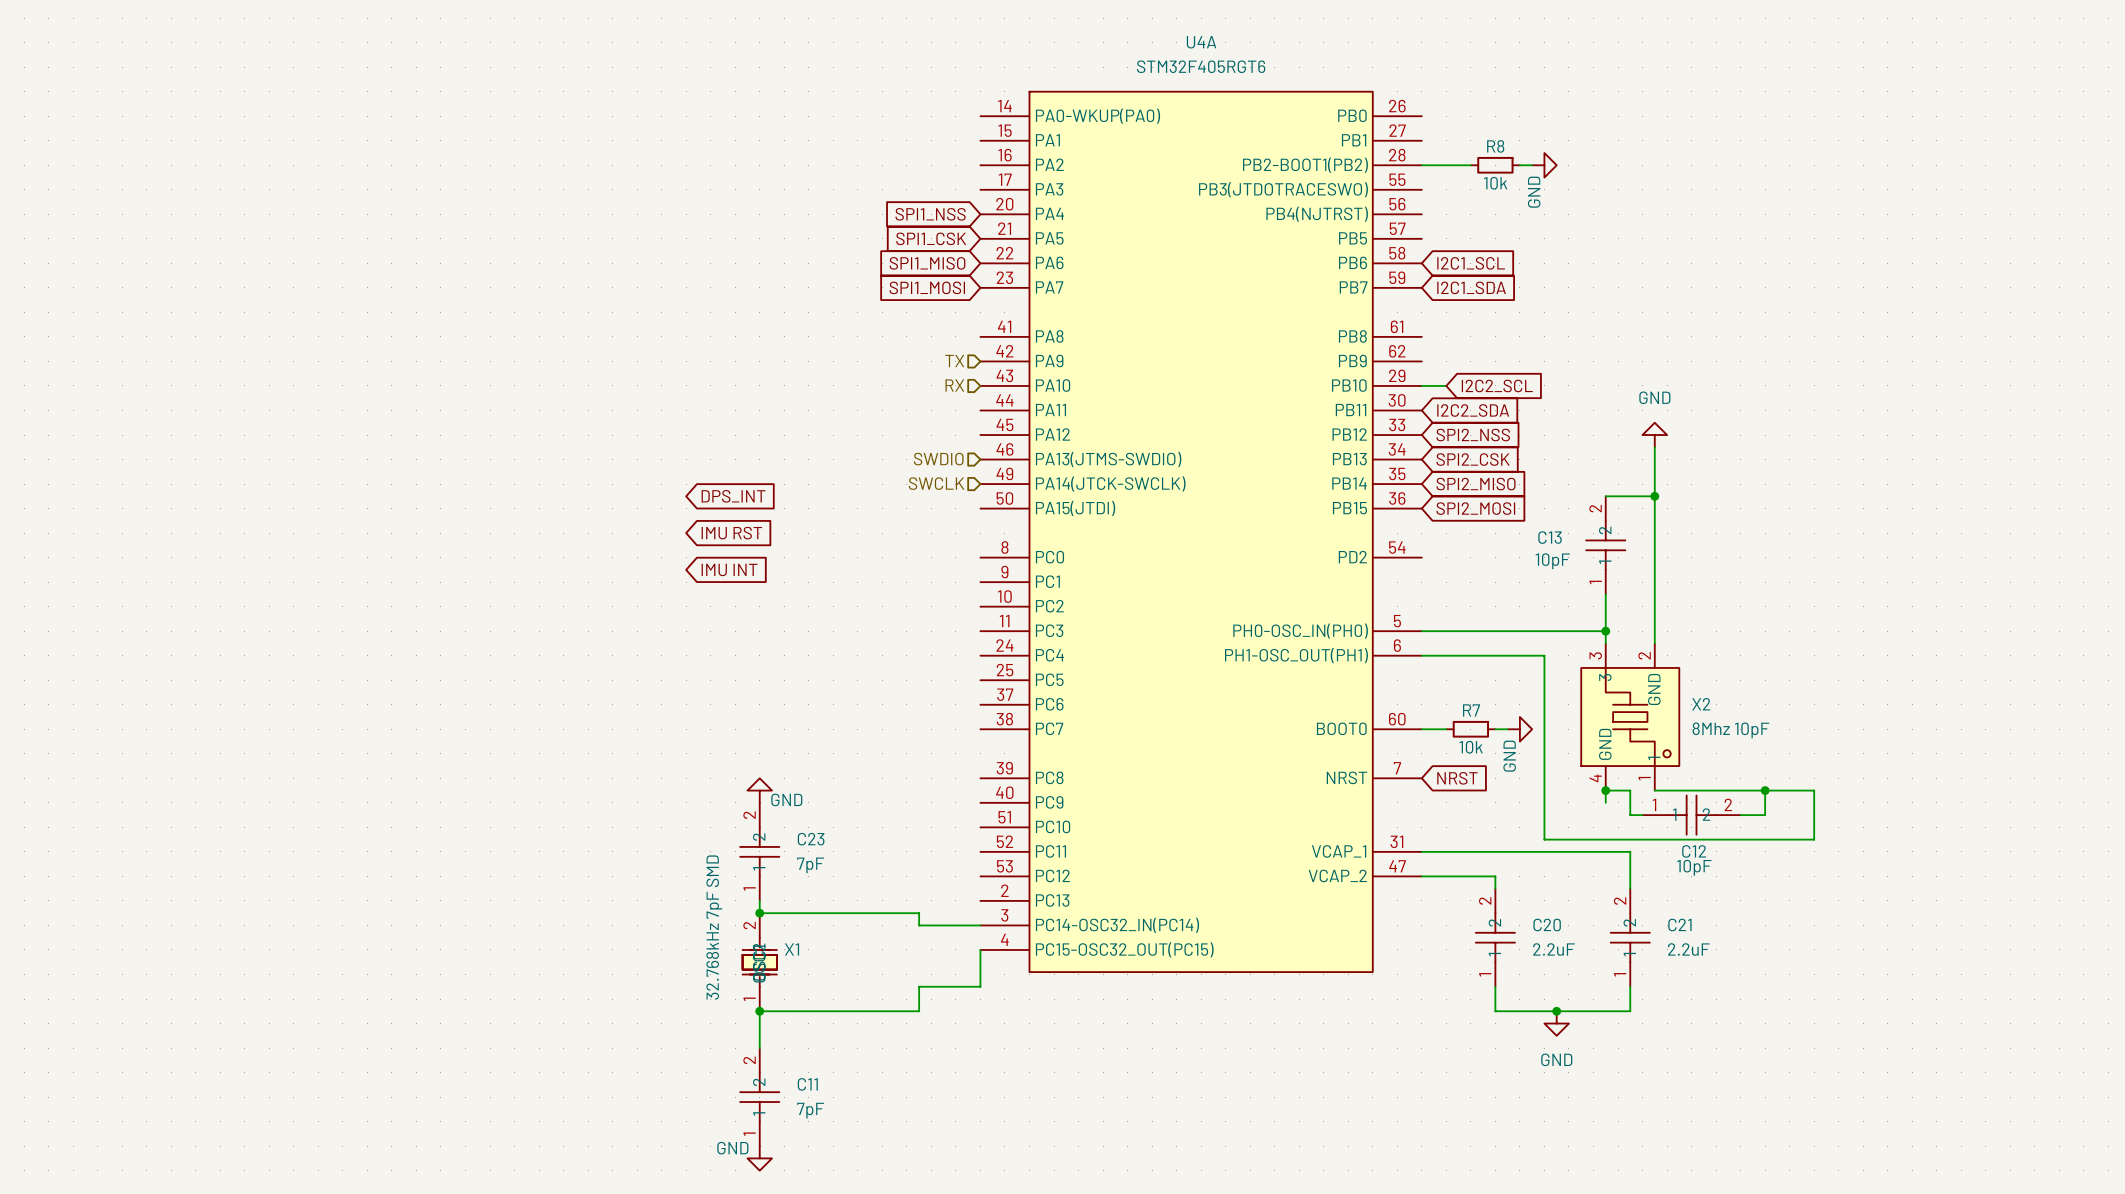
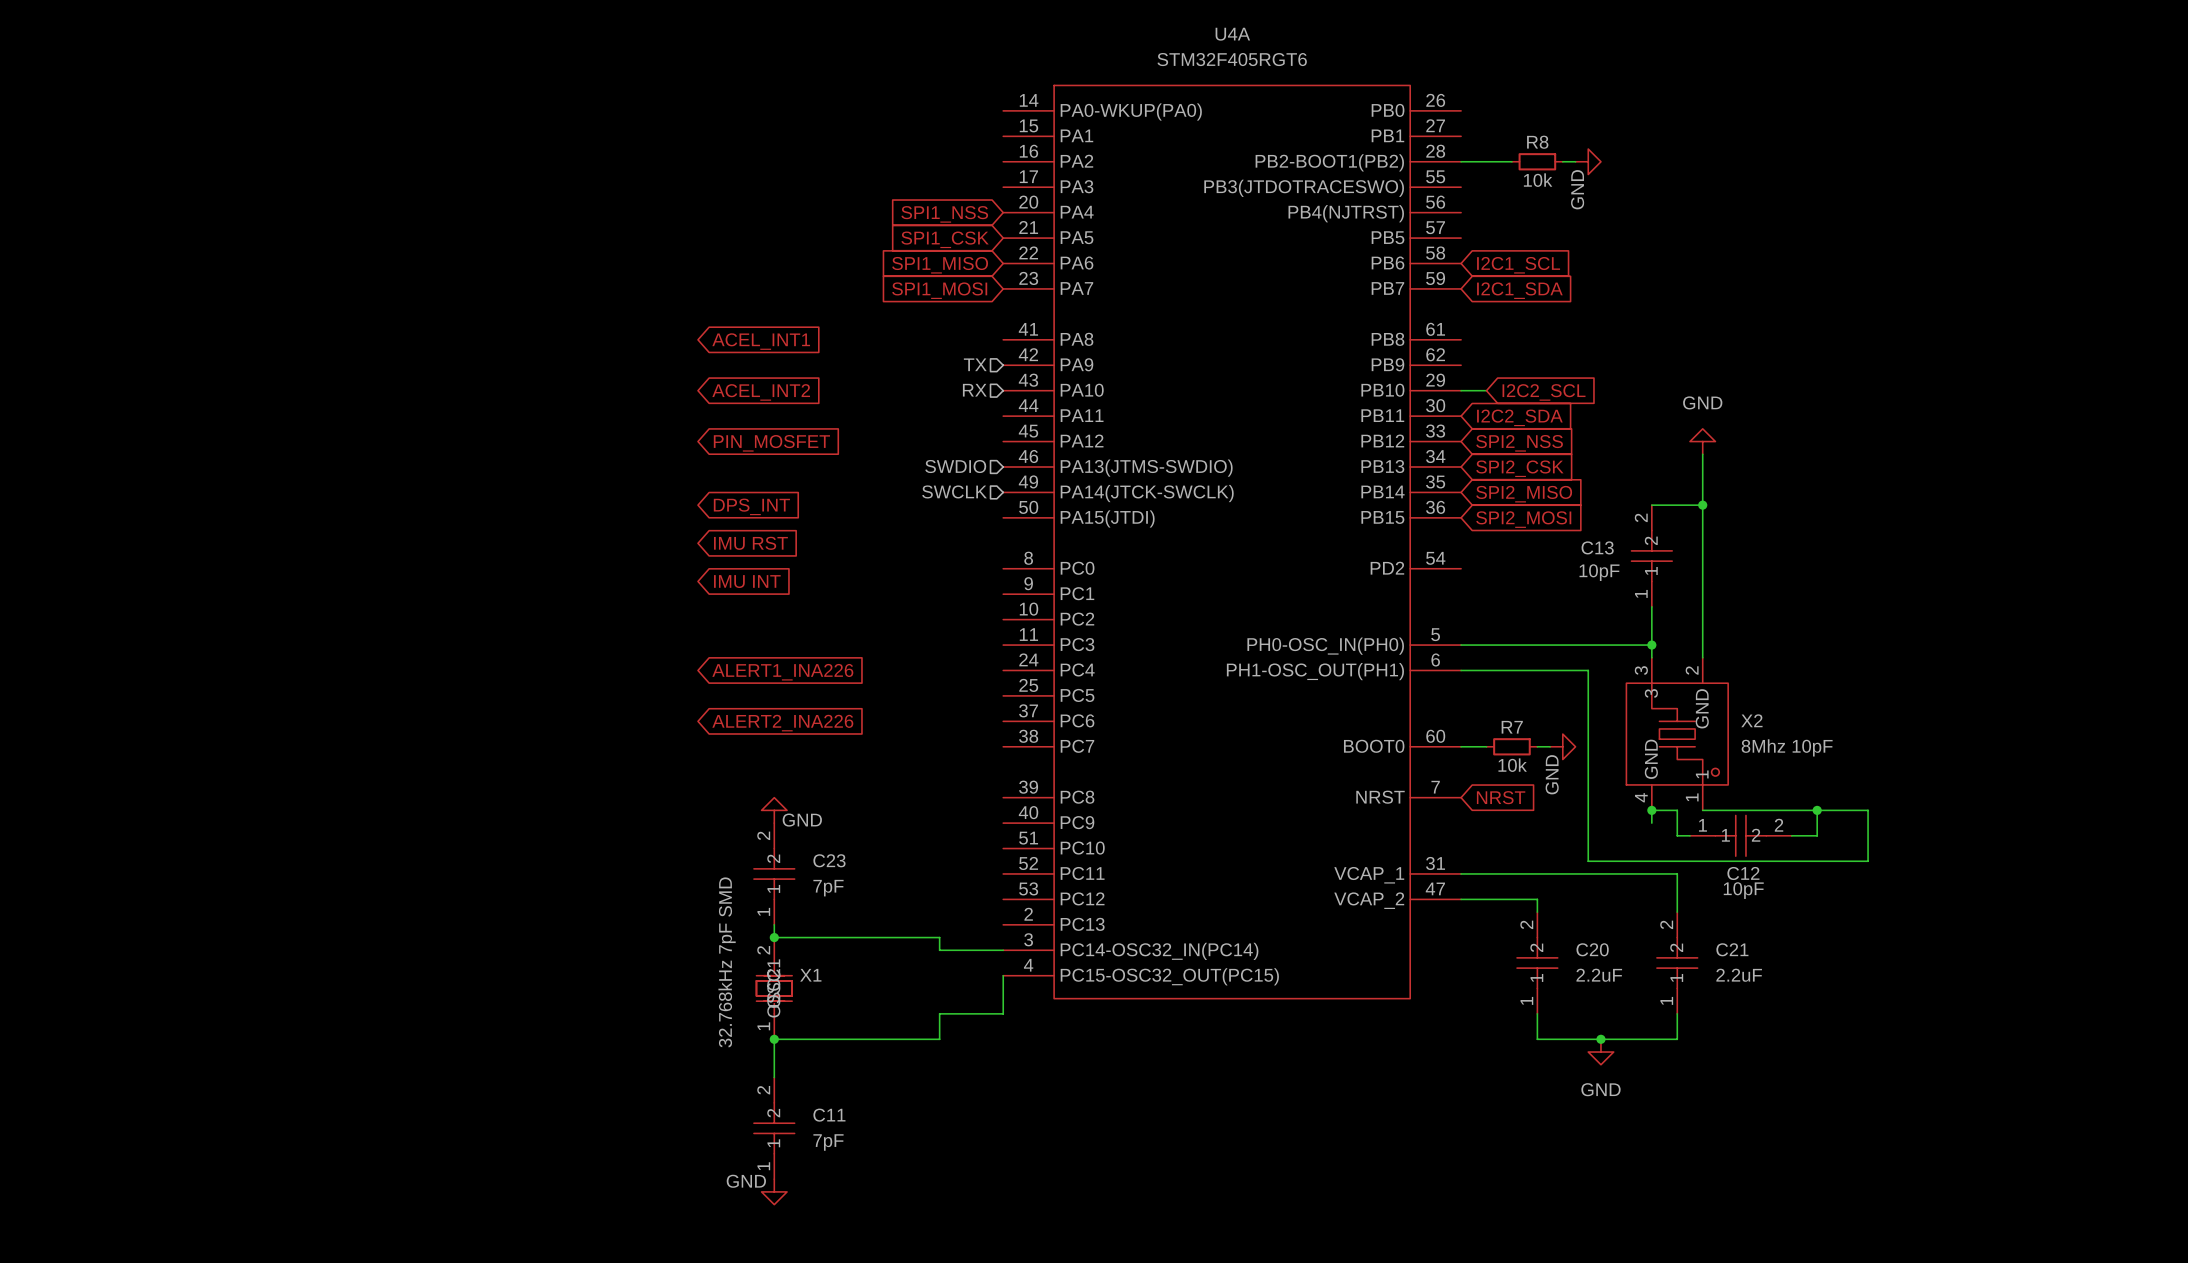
global label: none -> ACEL_INT1 (761, 341)
global label: none -> ACEL_INT2 (761, 392)
global label: none -> PIN_MOSFET (771, 443)
global label: none -> ALERT1_INA226 (782, 672)
global label: none -> ALERT2_INA226 (782, 723)

